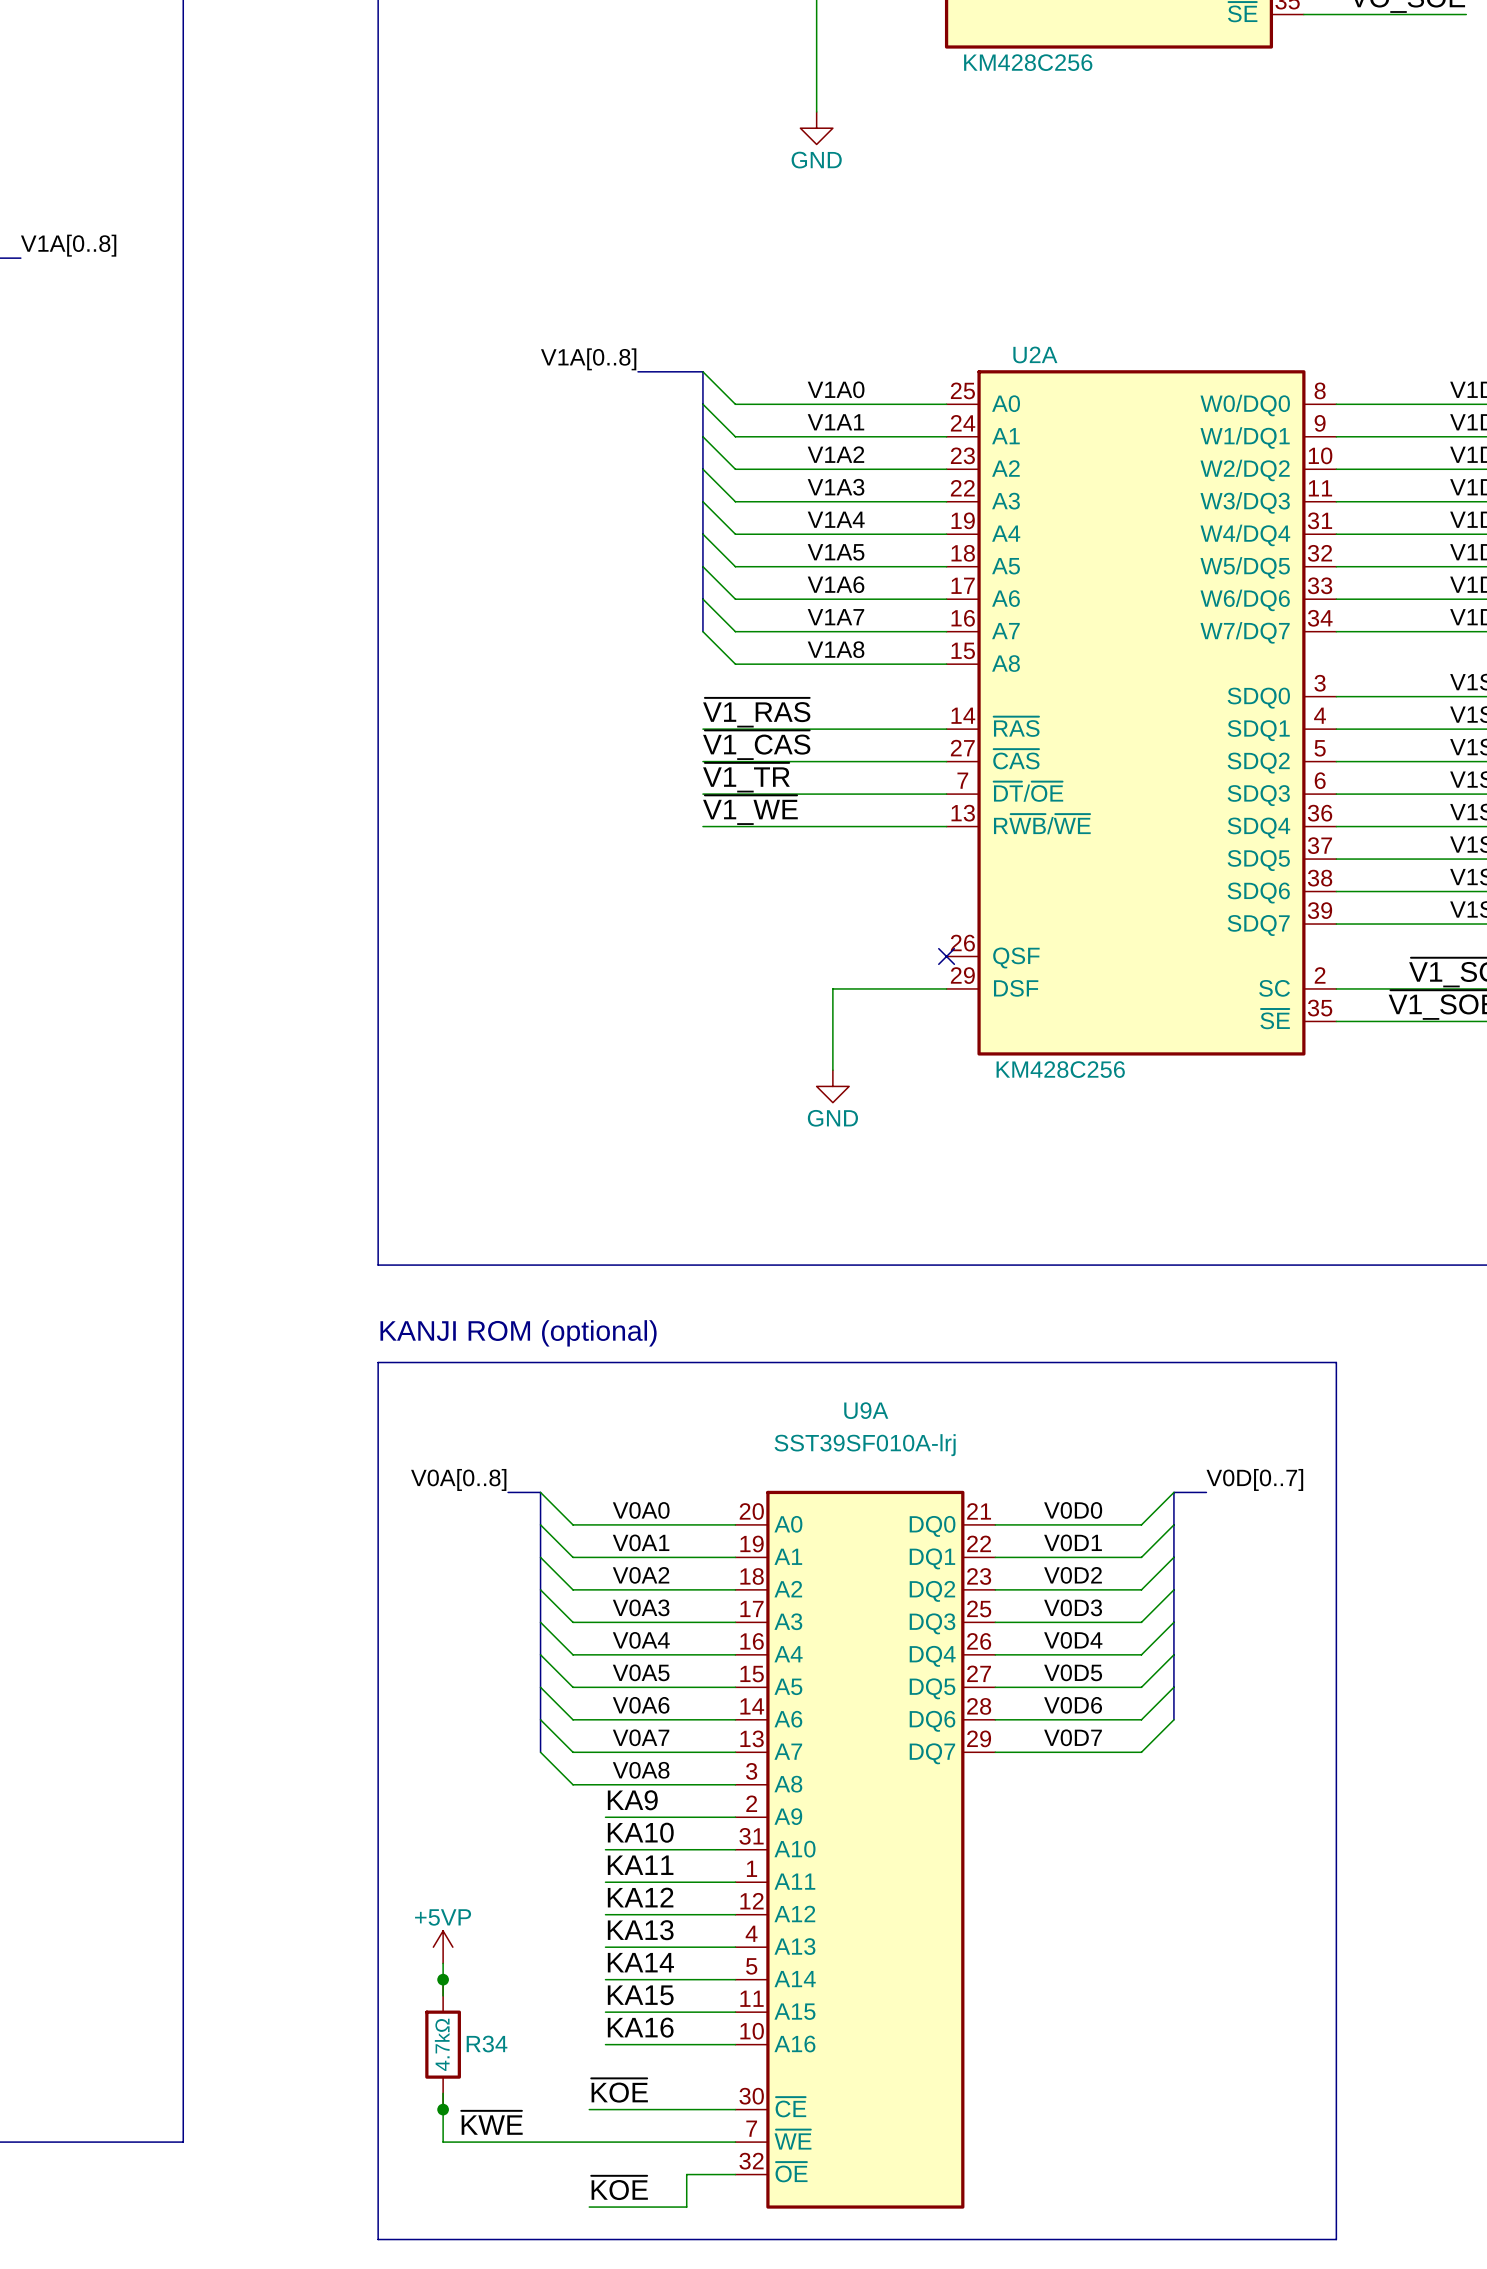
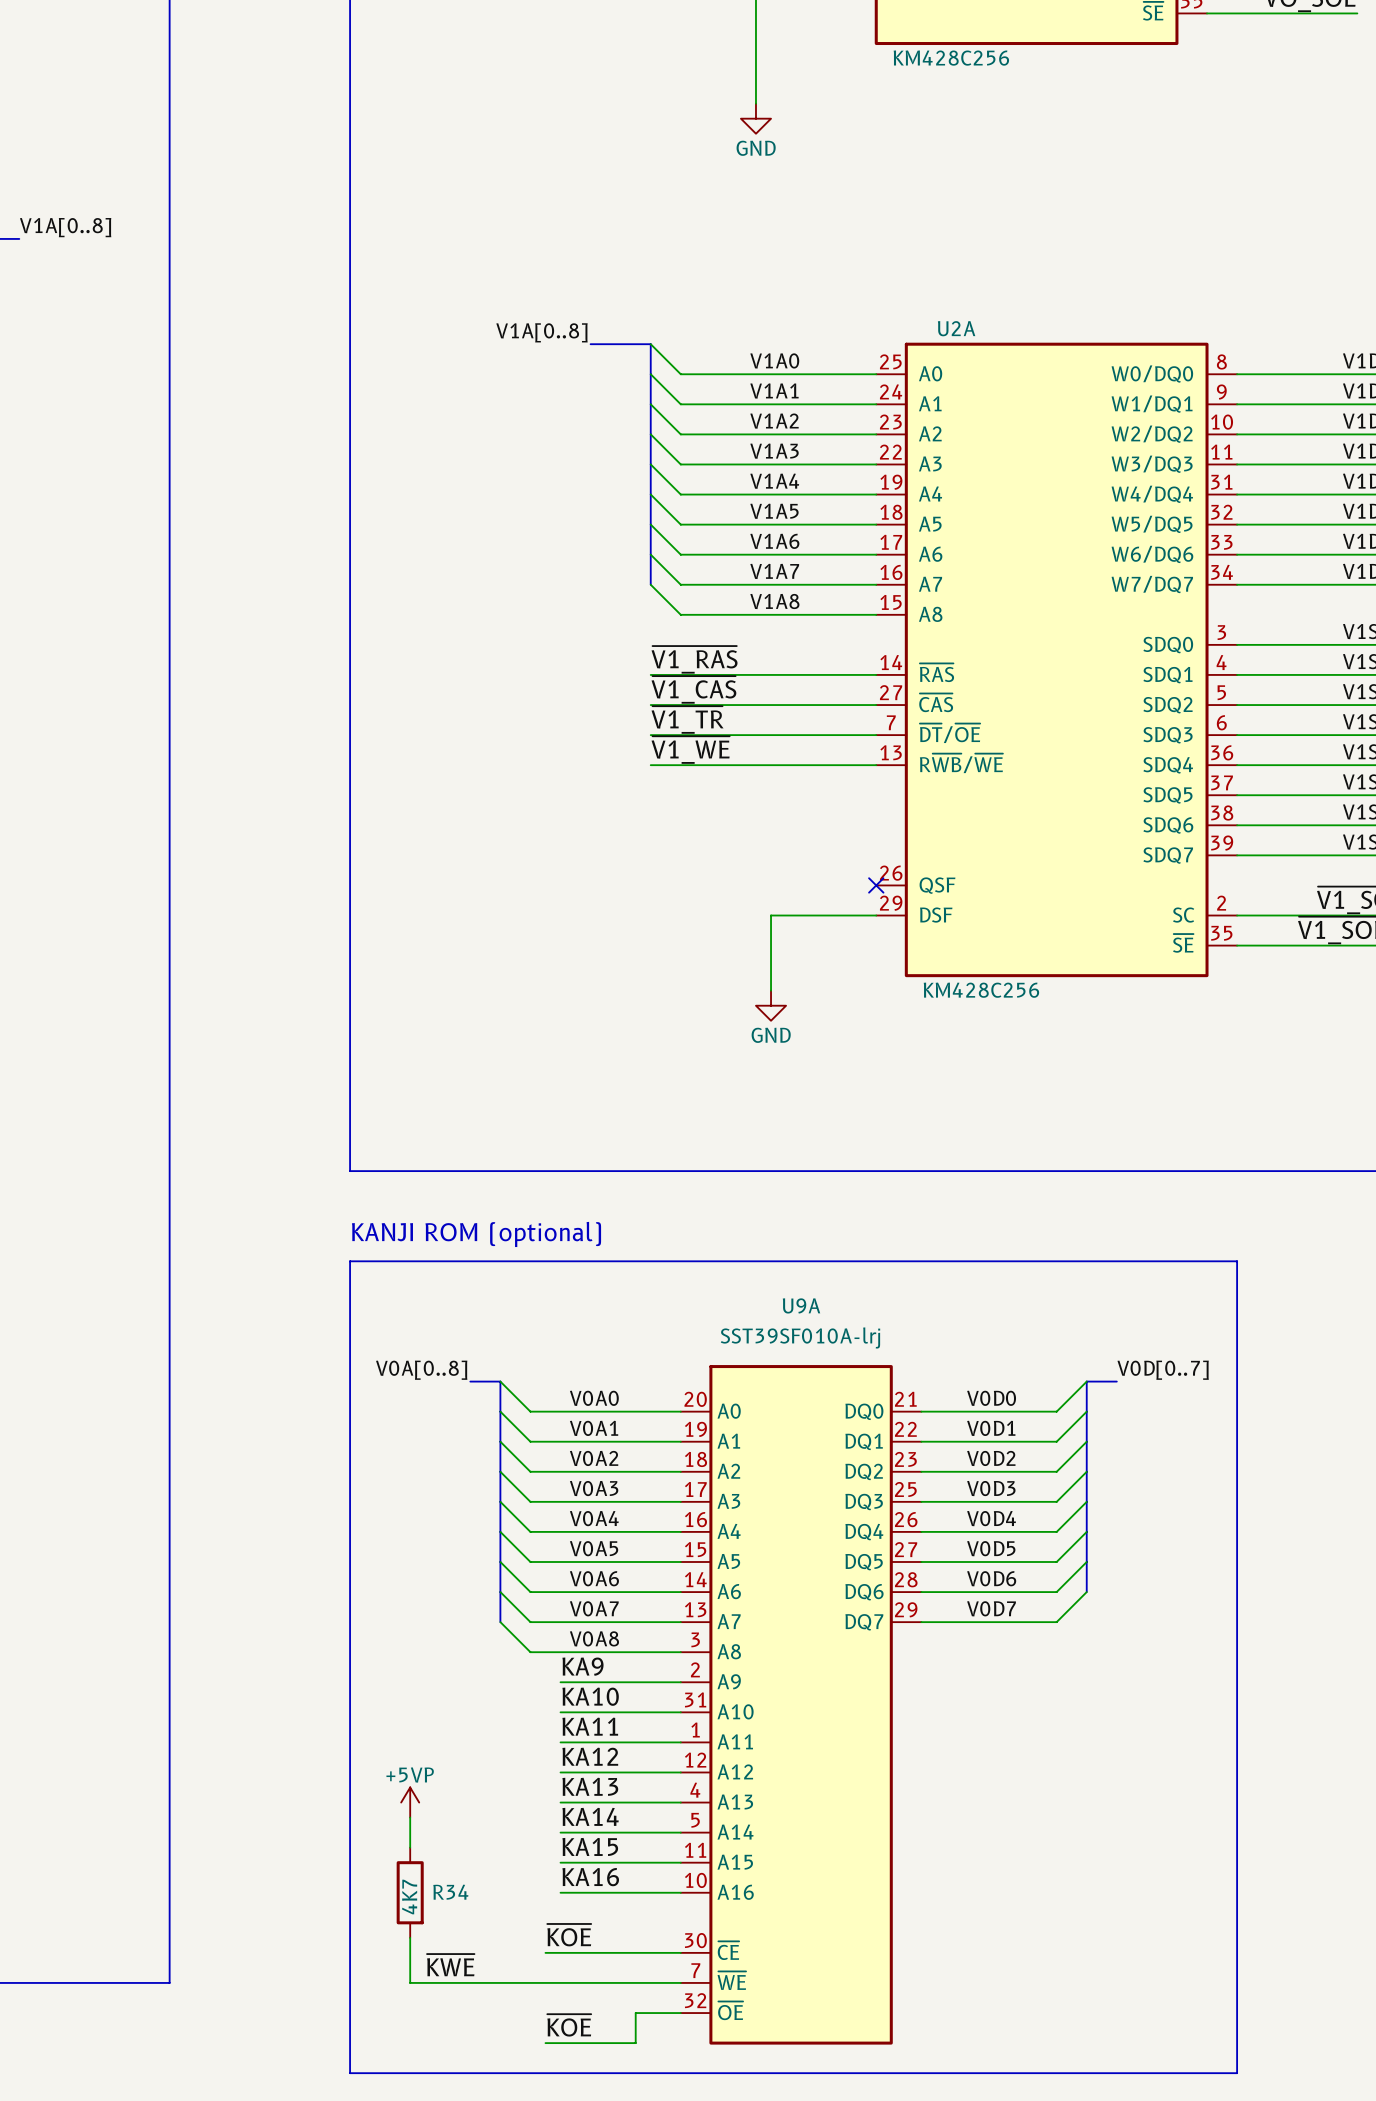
U9A symbol: [735, 1490, 996, 2209] -> [680, 1365, 922, 2045]
R34 symbol: [425, 1979, 461, 2110] -> [396, 1847, 424, 1938]
junction: (443, 1979) -> none
R34 text: 4.7kΩ (442, 2044) -> none
R34 value: none -> 4K7 (409, 1897)
junction: (443, 2109) -> none

